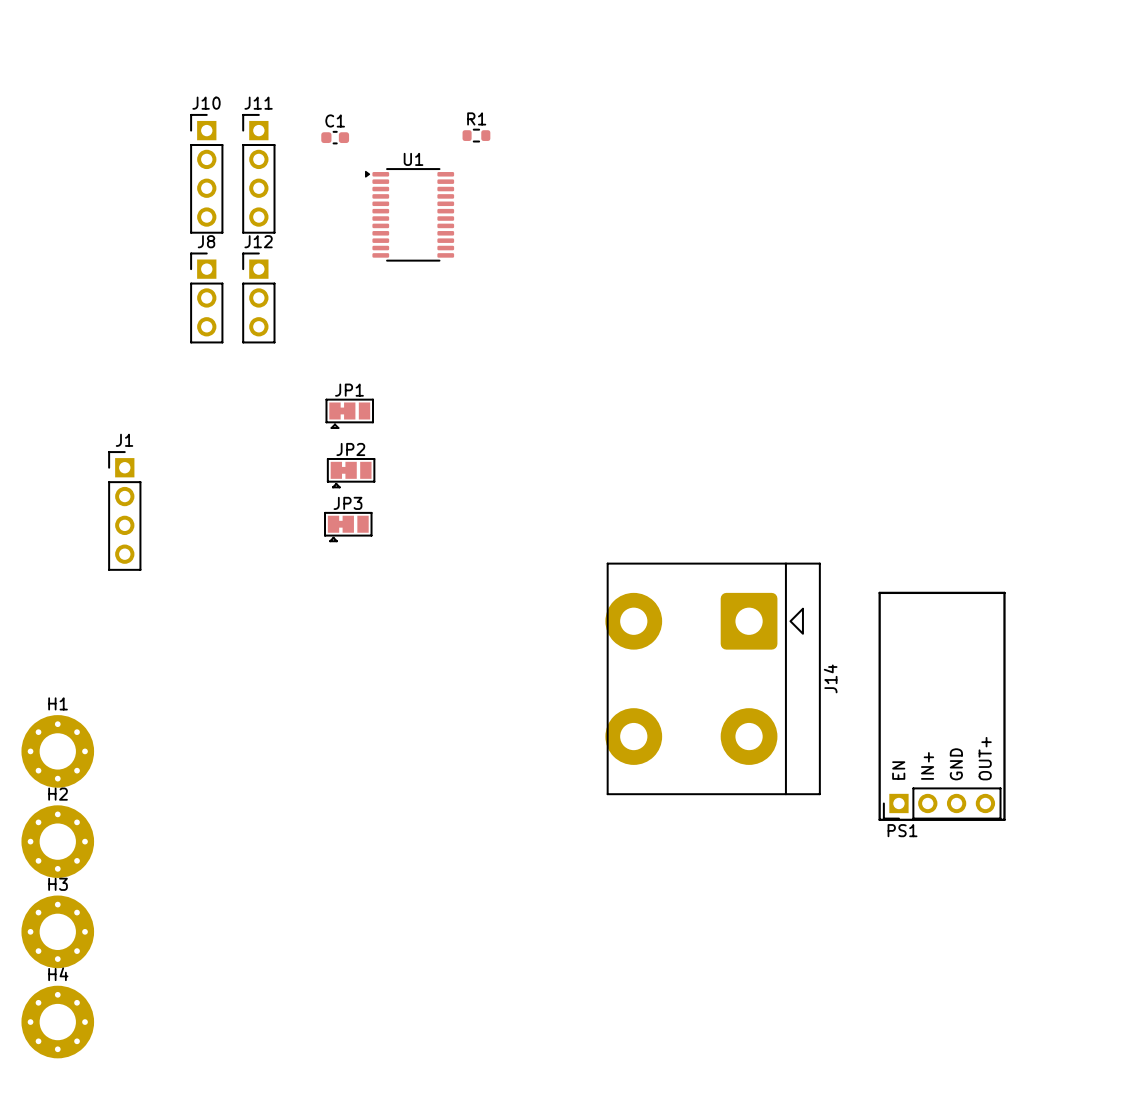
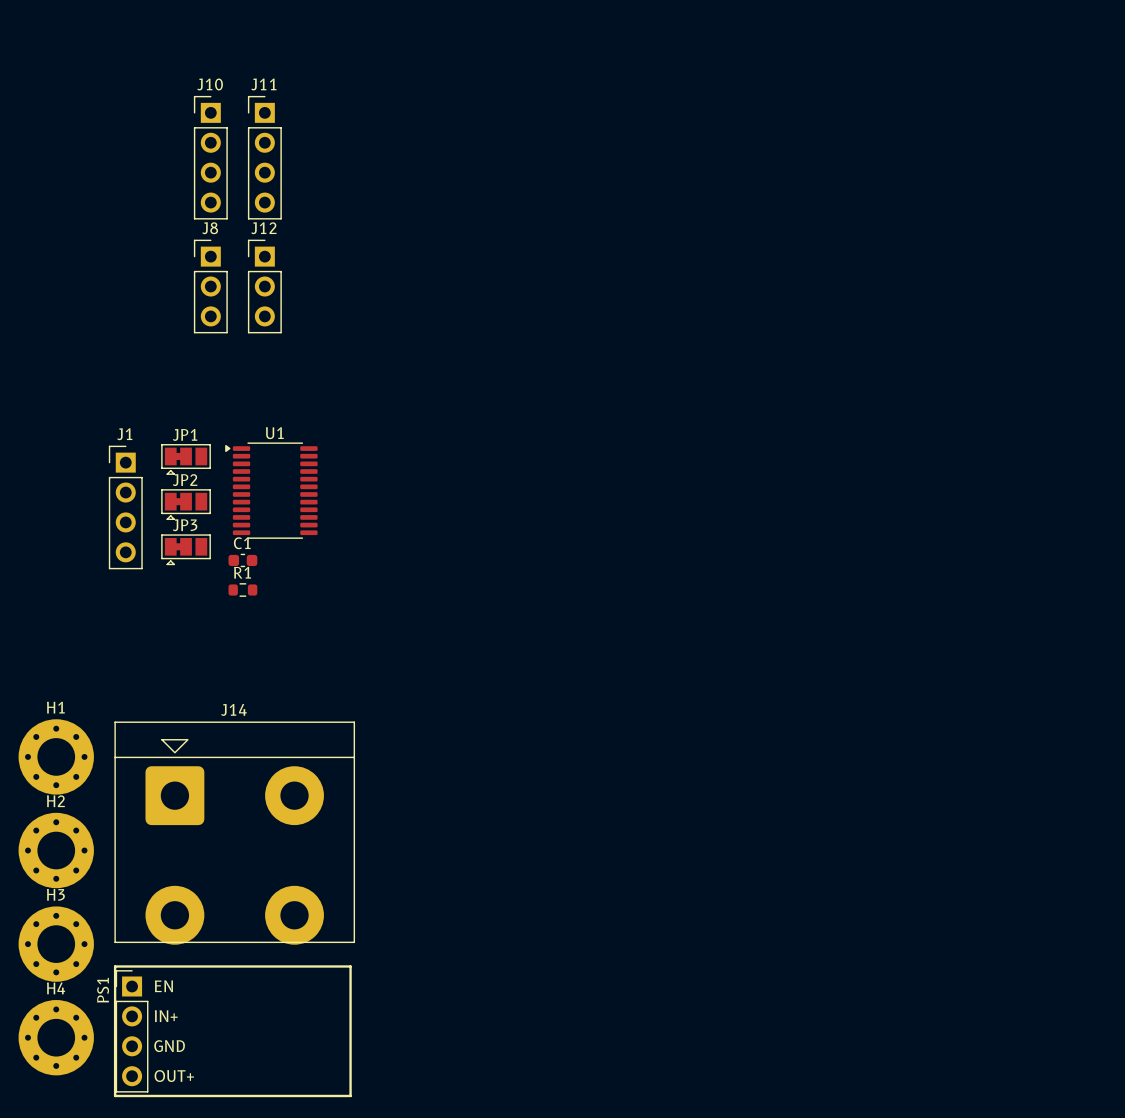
R1 position: (476, 135) -> (242, 590)
C1 position: (335, 137) -> (242, 560)
U1 position: (409, 214) -> (271, 490)
JP1 position: (349, 413) -> (186, 459)
JP2 position: (351, 473) -> (186, 504)
JP3 position: (348, 527) -> (186, 549)
J14 rotation: 0° (712, 678) -> 90° counterclockwise (234, 833)
J14 position: (712, 678) -> (234, 833)
PS1 rotation: 0° (942, 706) -> 90° clockwise (232, 1031)
PS1 position: (942, 706) -> (232, 1031)

